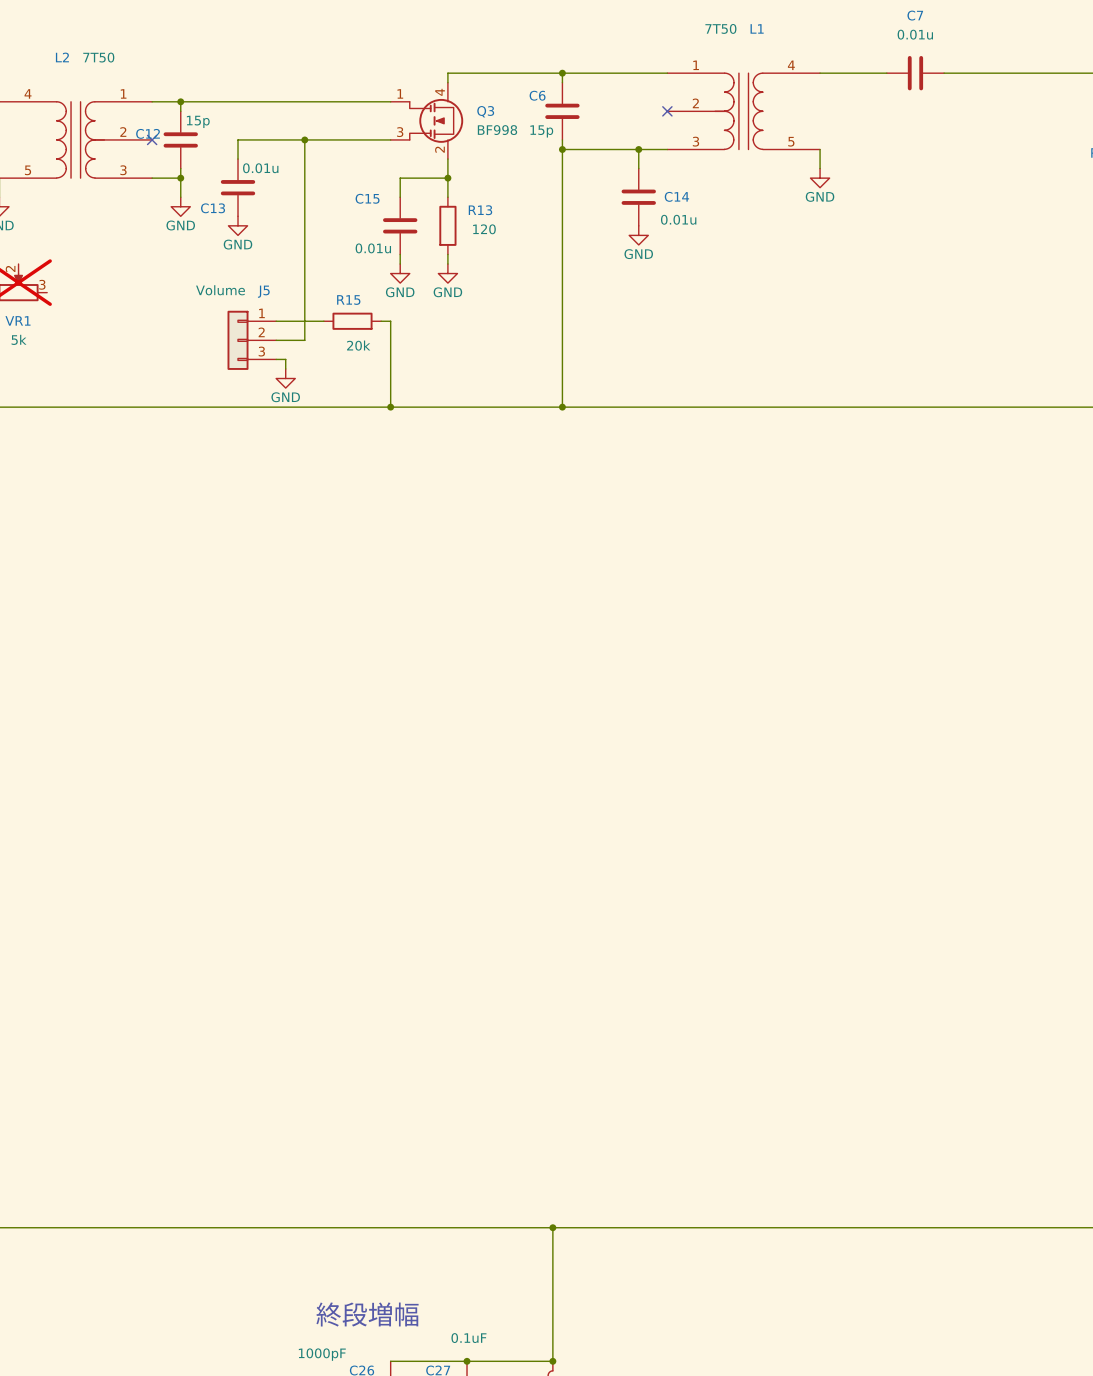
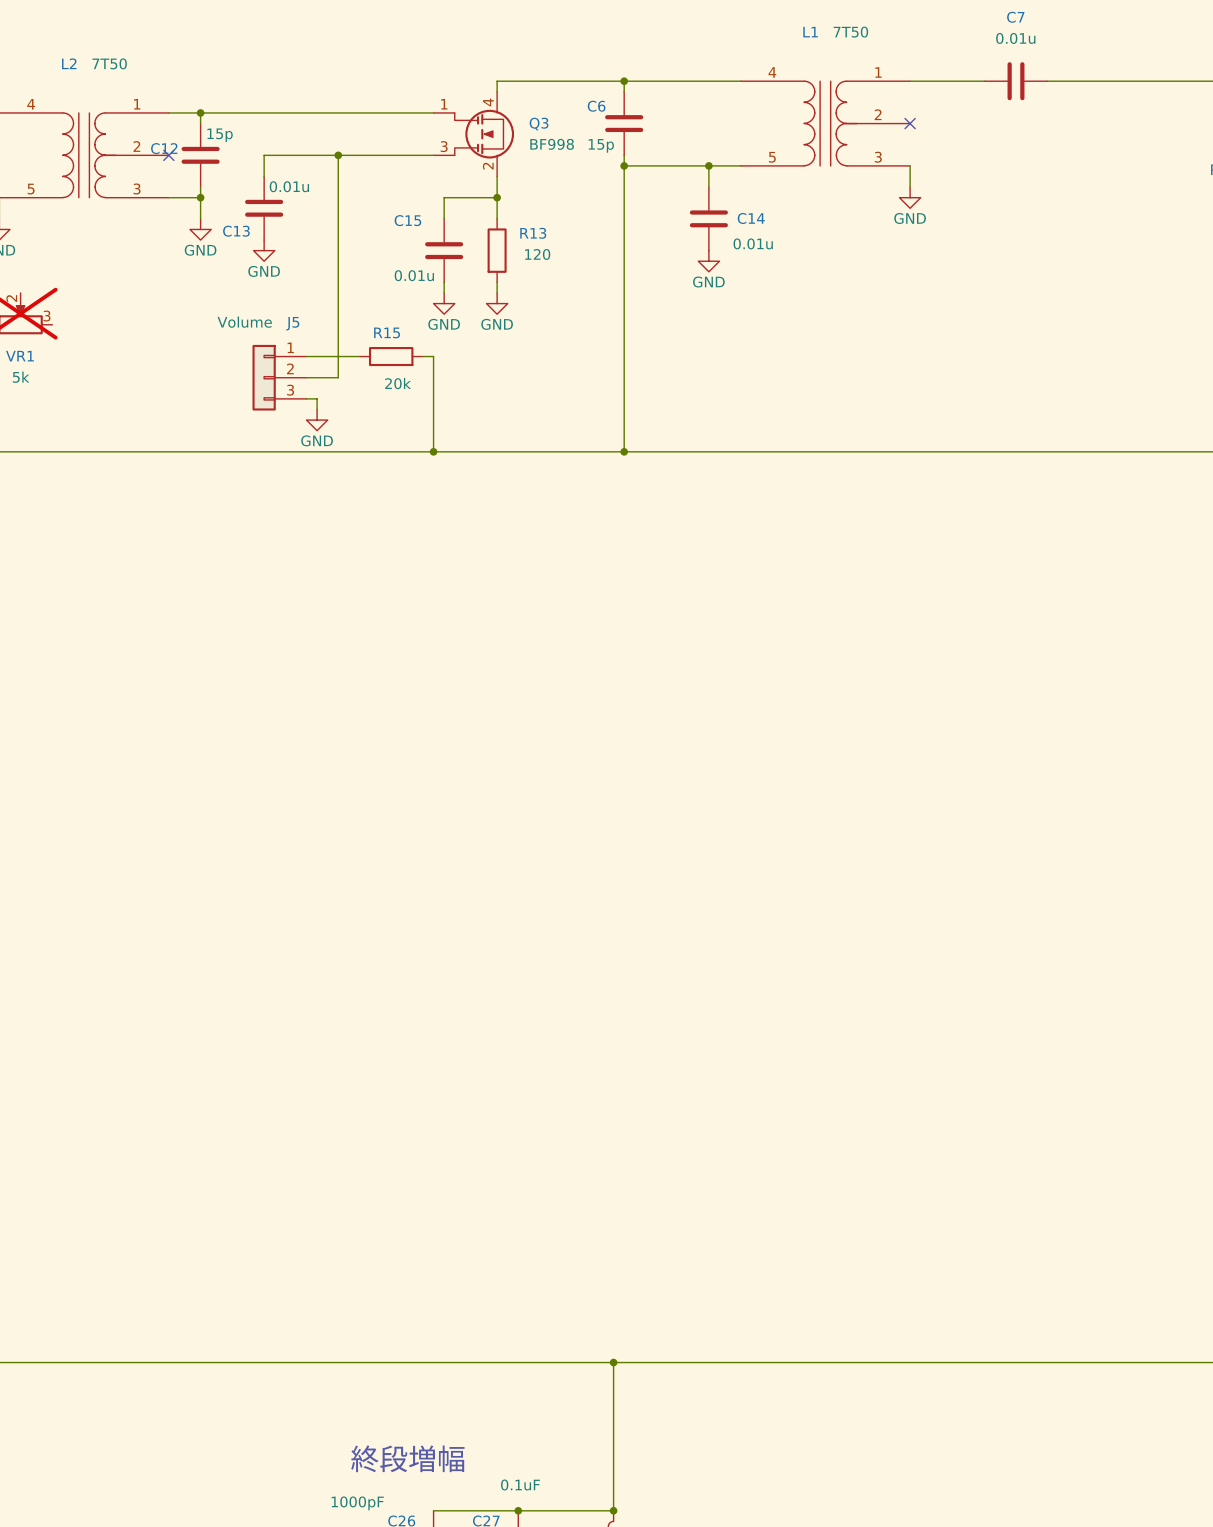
no-connect mark: (667, 111) -> none
L1 flip: as is (738, 111) -> left-right (830, 123)
no-connect mark: none -> (910, 123)

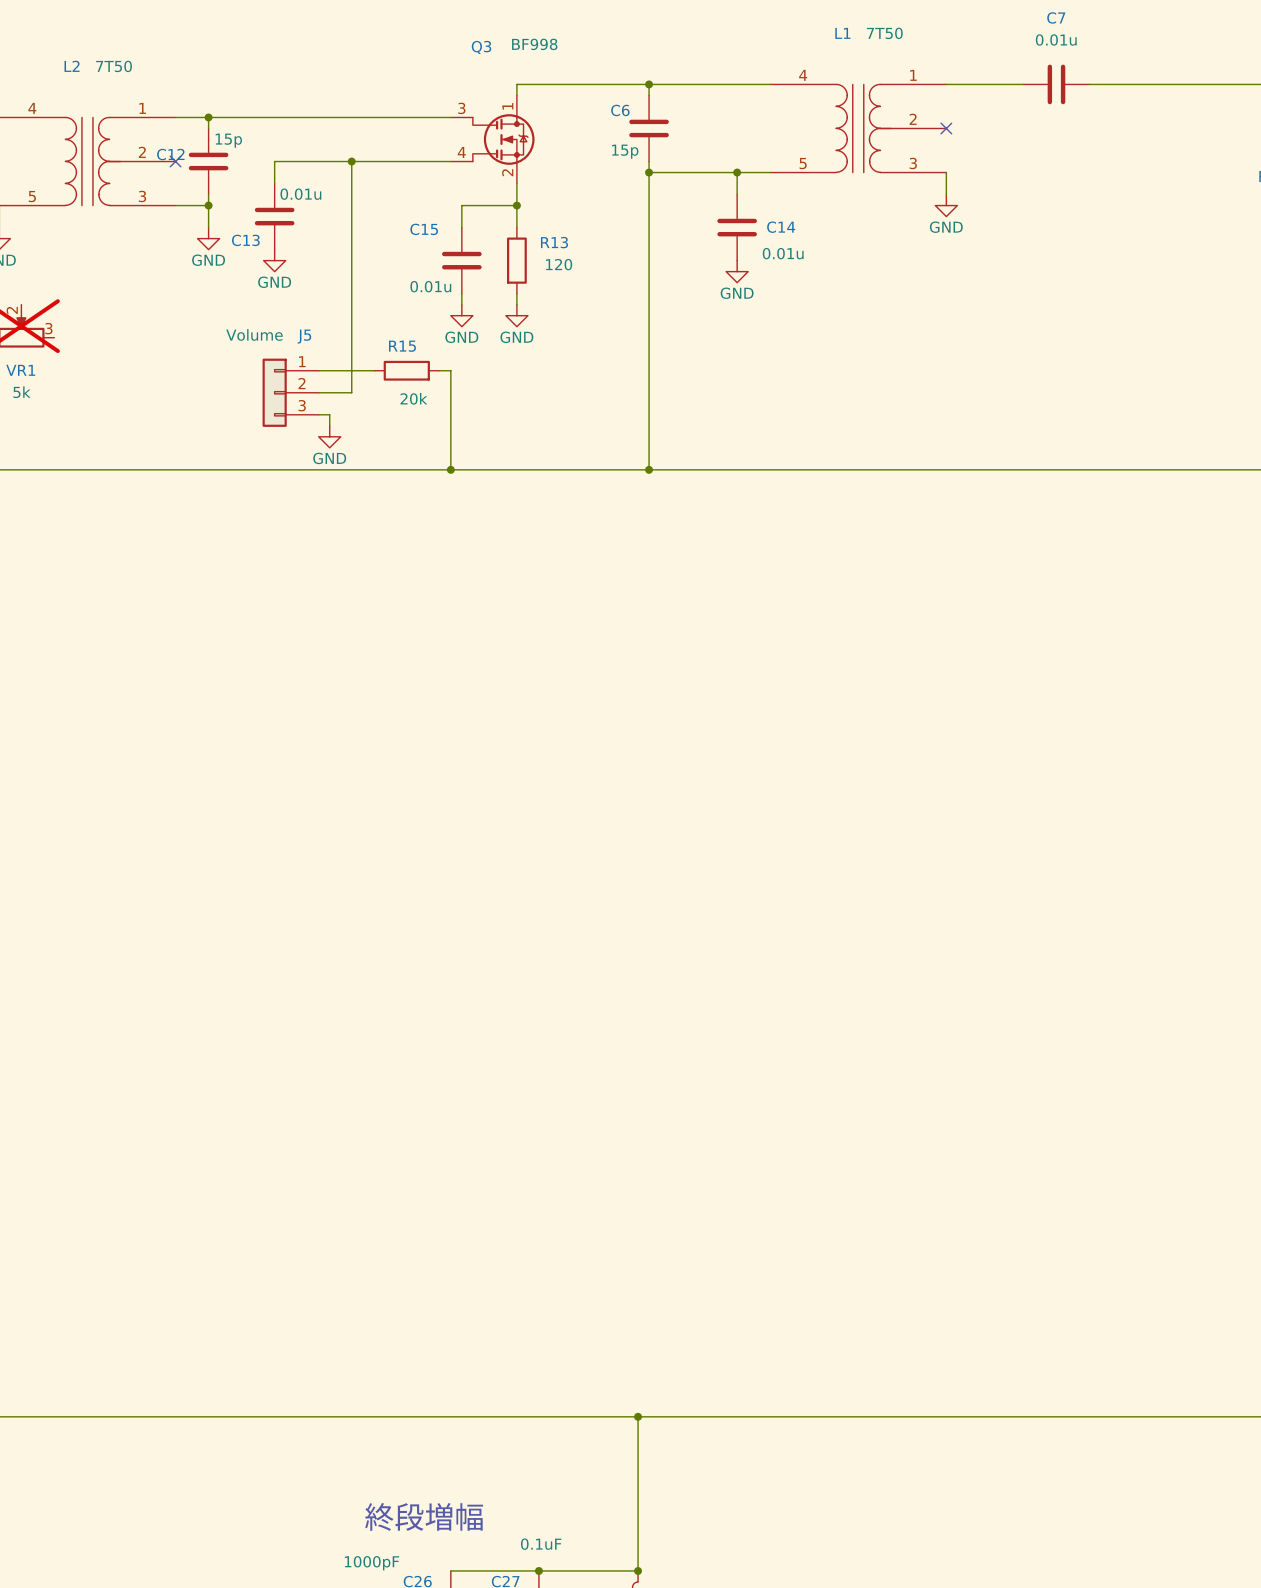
Q3 symbol: [433, 91, 515, 177] -> [450, 95, 535, 184]
Q3 name position: Q3 (539, 124) -> Q3 (481, 47)
Q3 value position: BF998 (552, 144) -> BF998 (534, 44)

